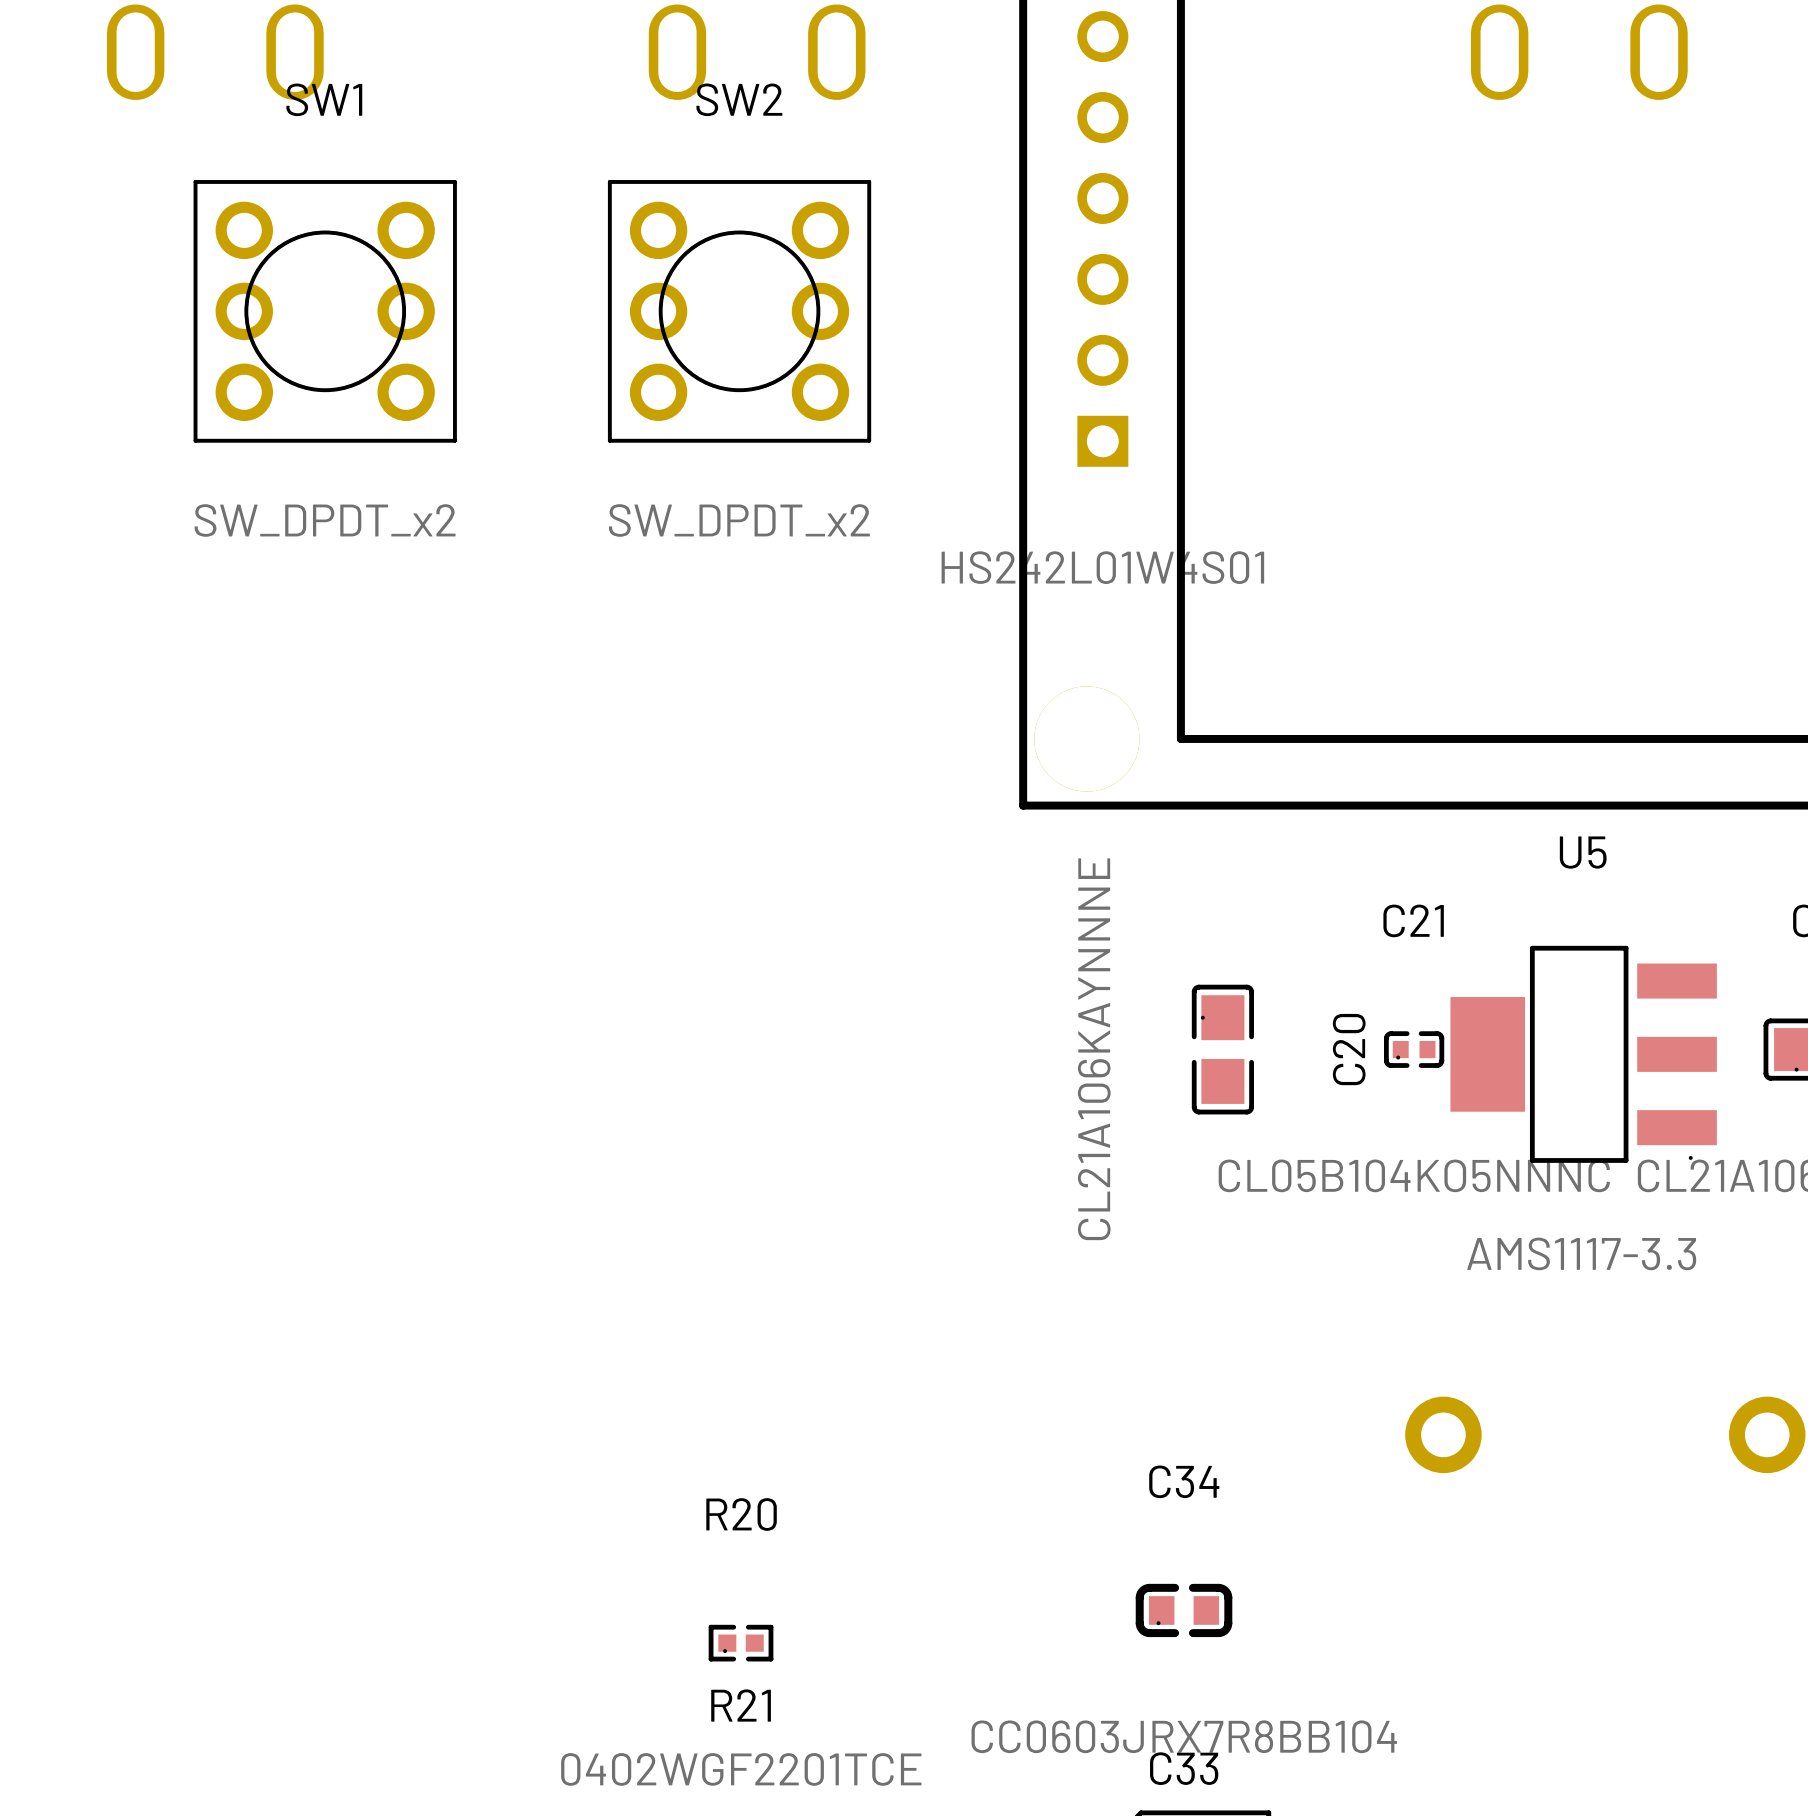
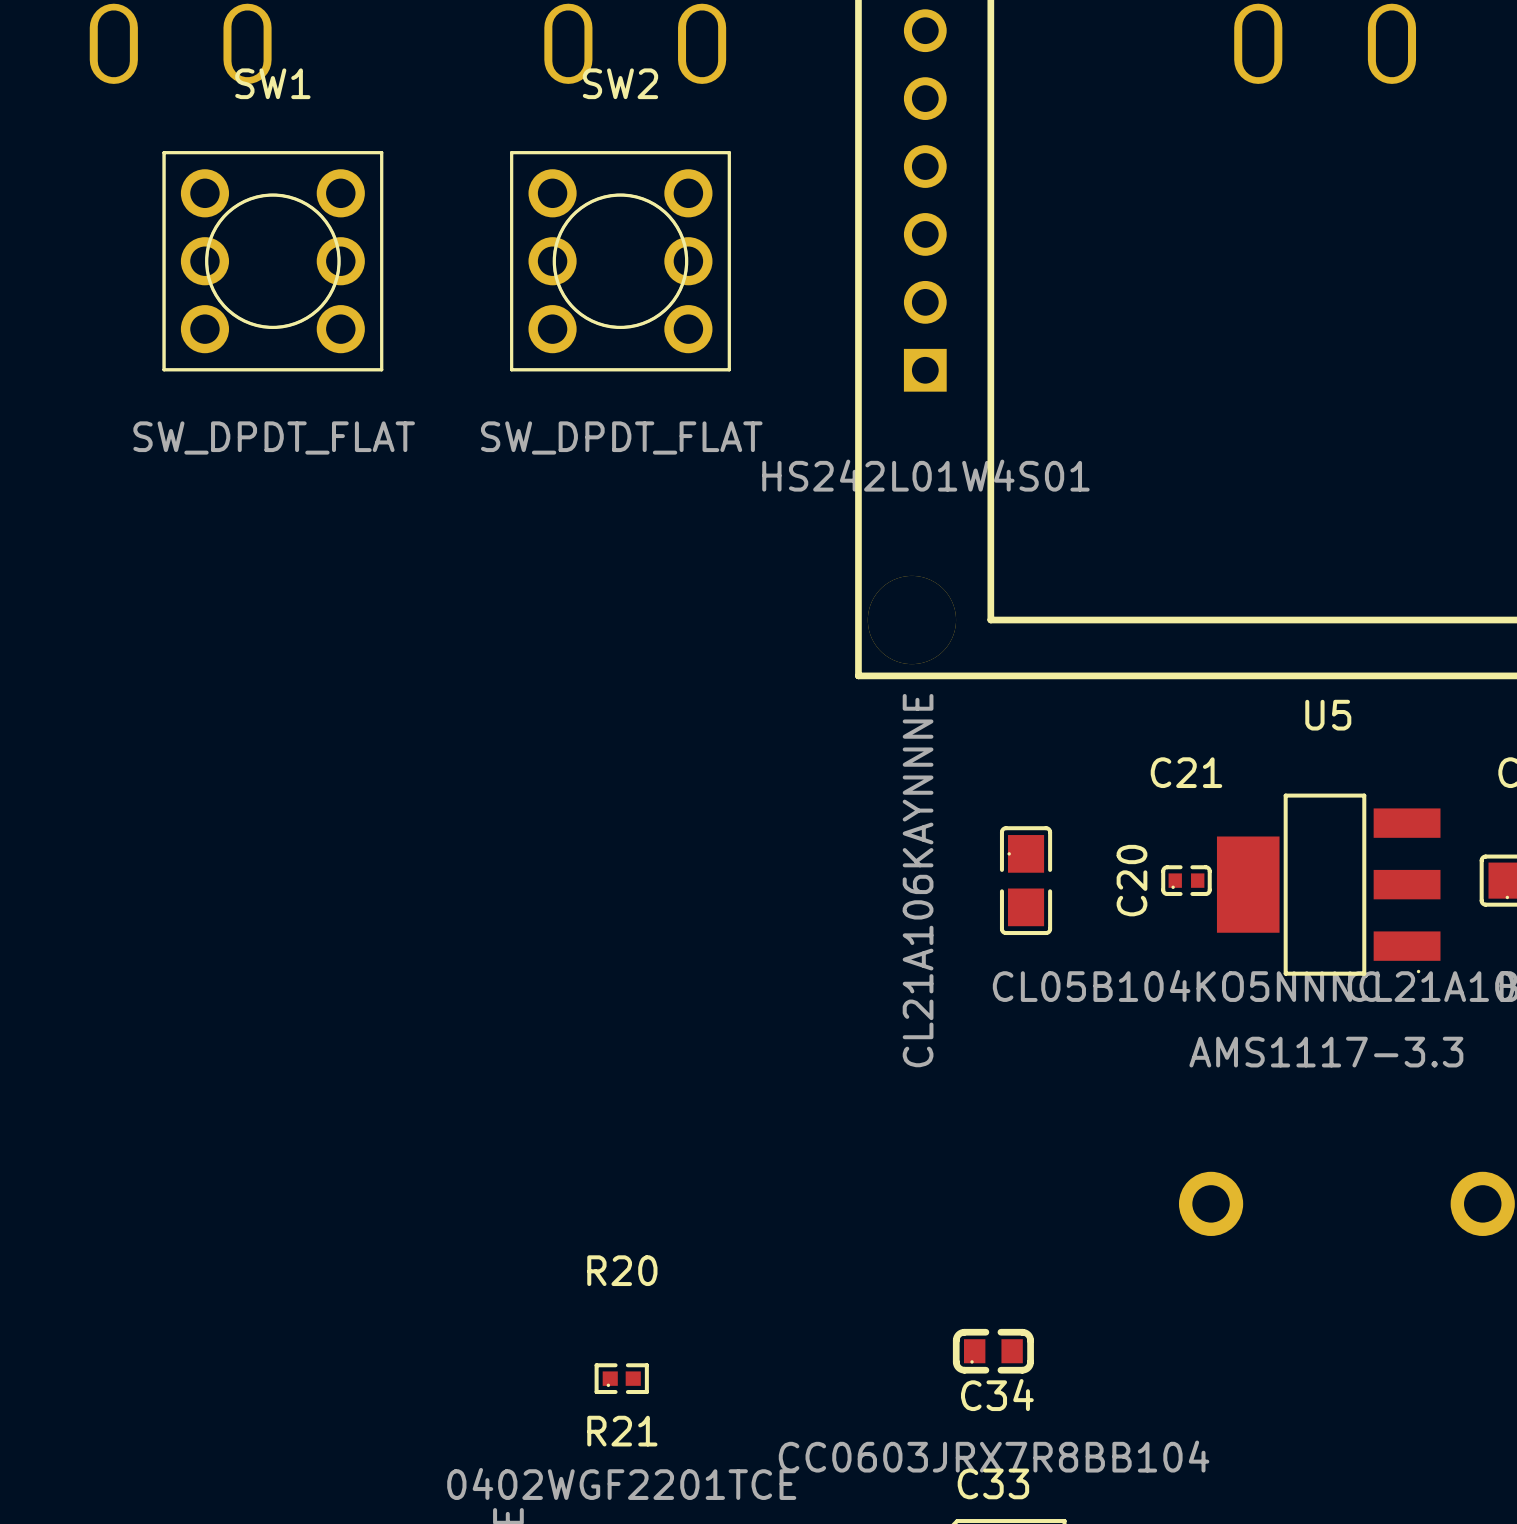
SW1 value: SW_DPDT_x2 (325, 520) -> SW_DPDT_FLAT (274, 437)
SW2 value: SW_DPDT_x2 (739, 520) -> SW_DPDT_FLAT (621, 437)
C34 name position: C34 (1184, 1481) -> C34 (997, 1395)

